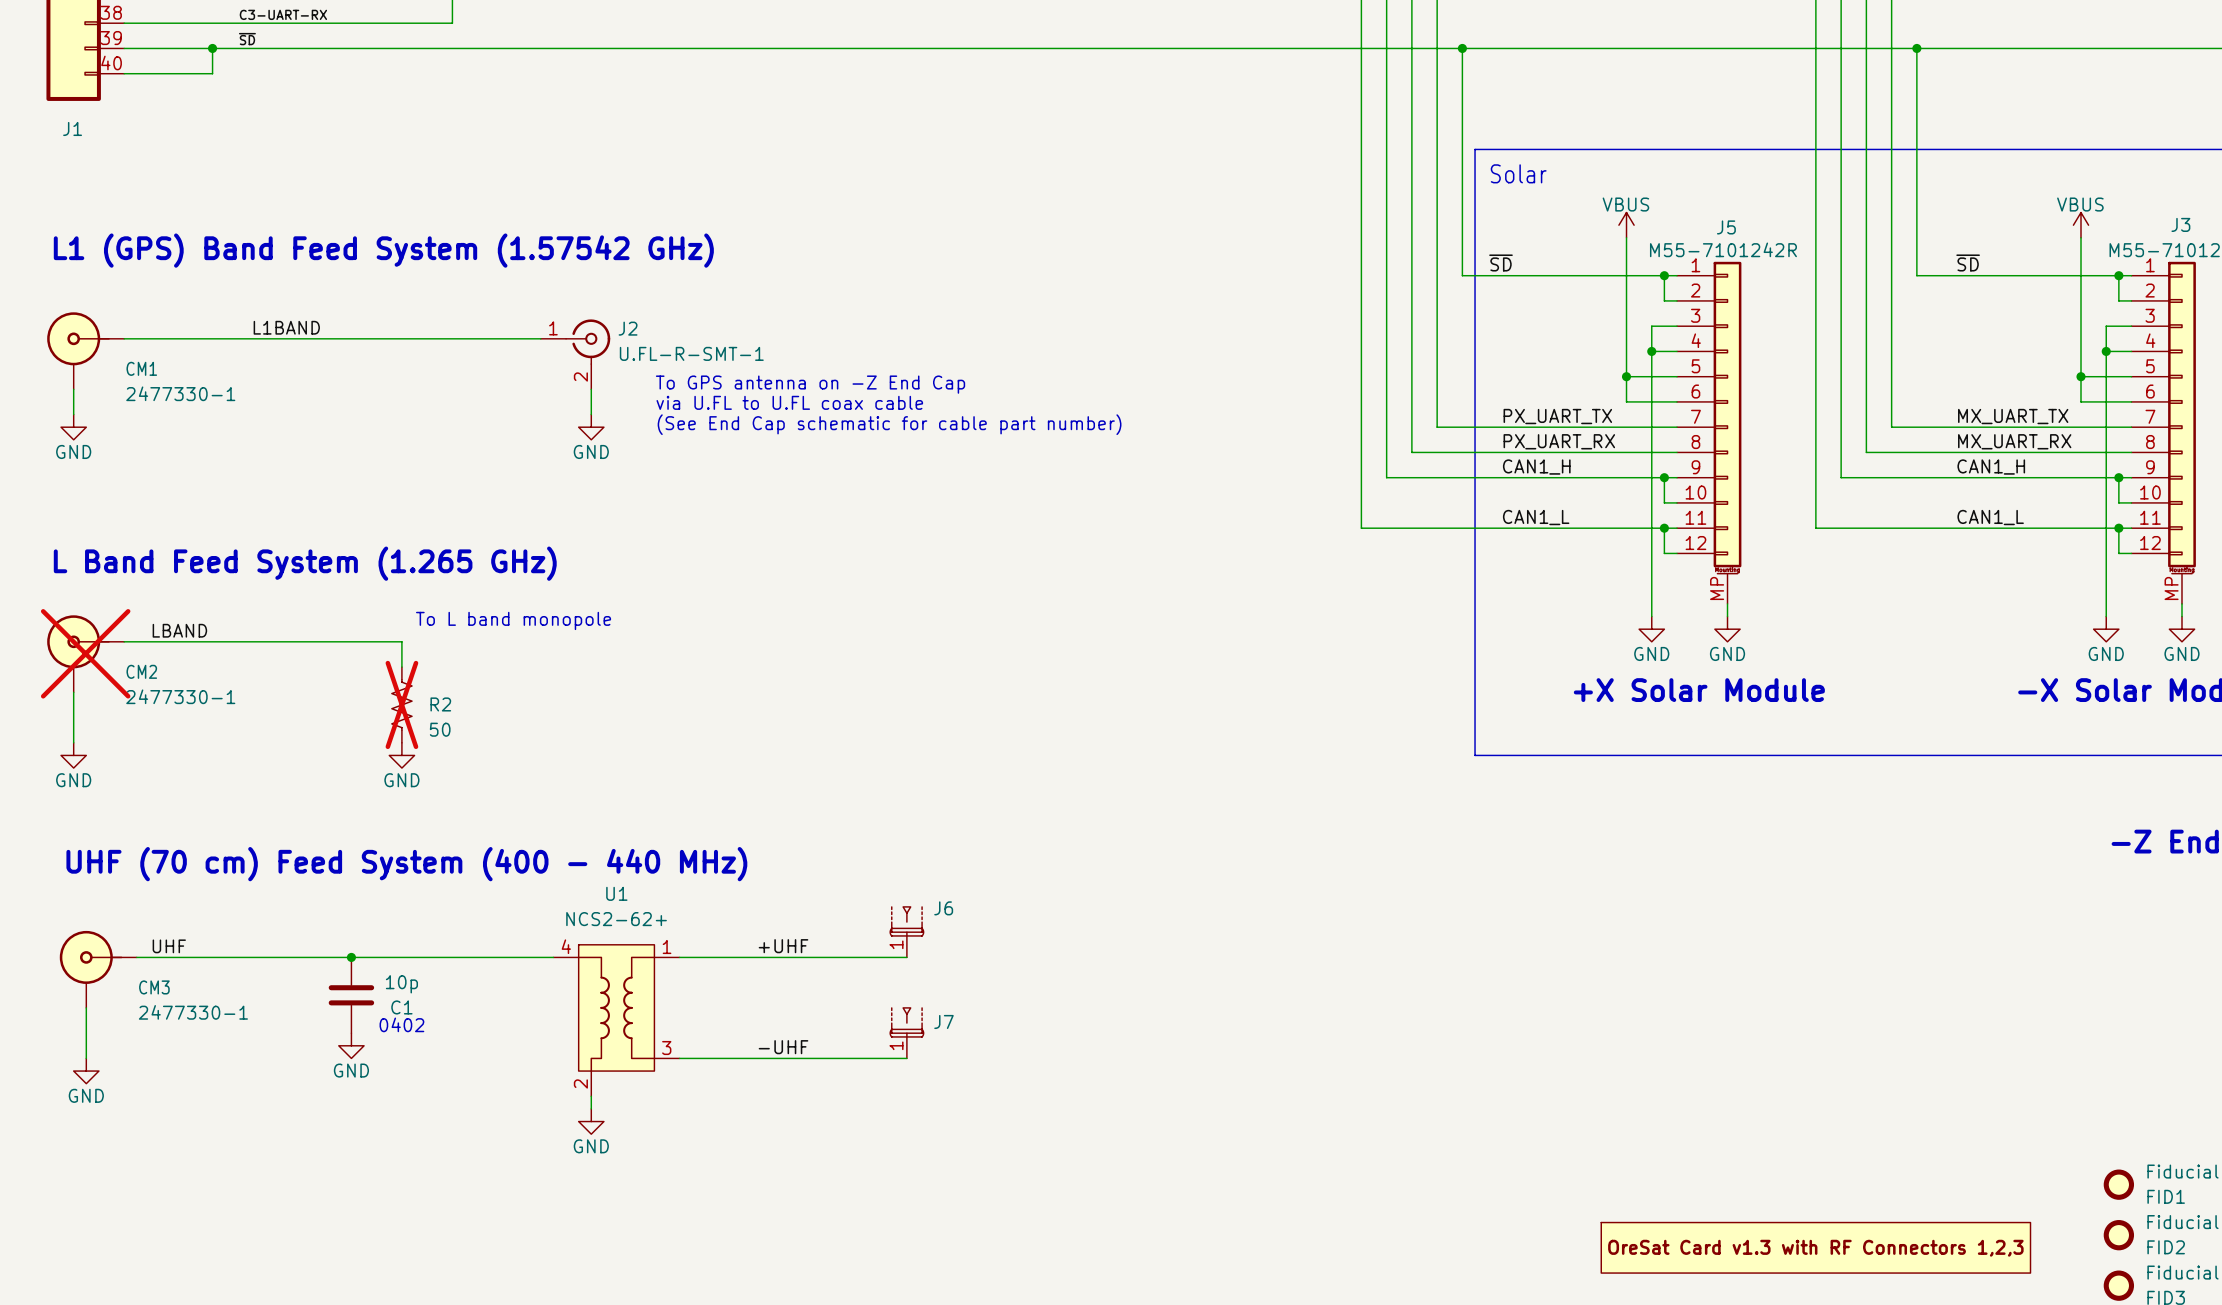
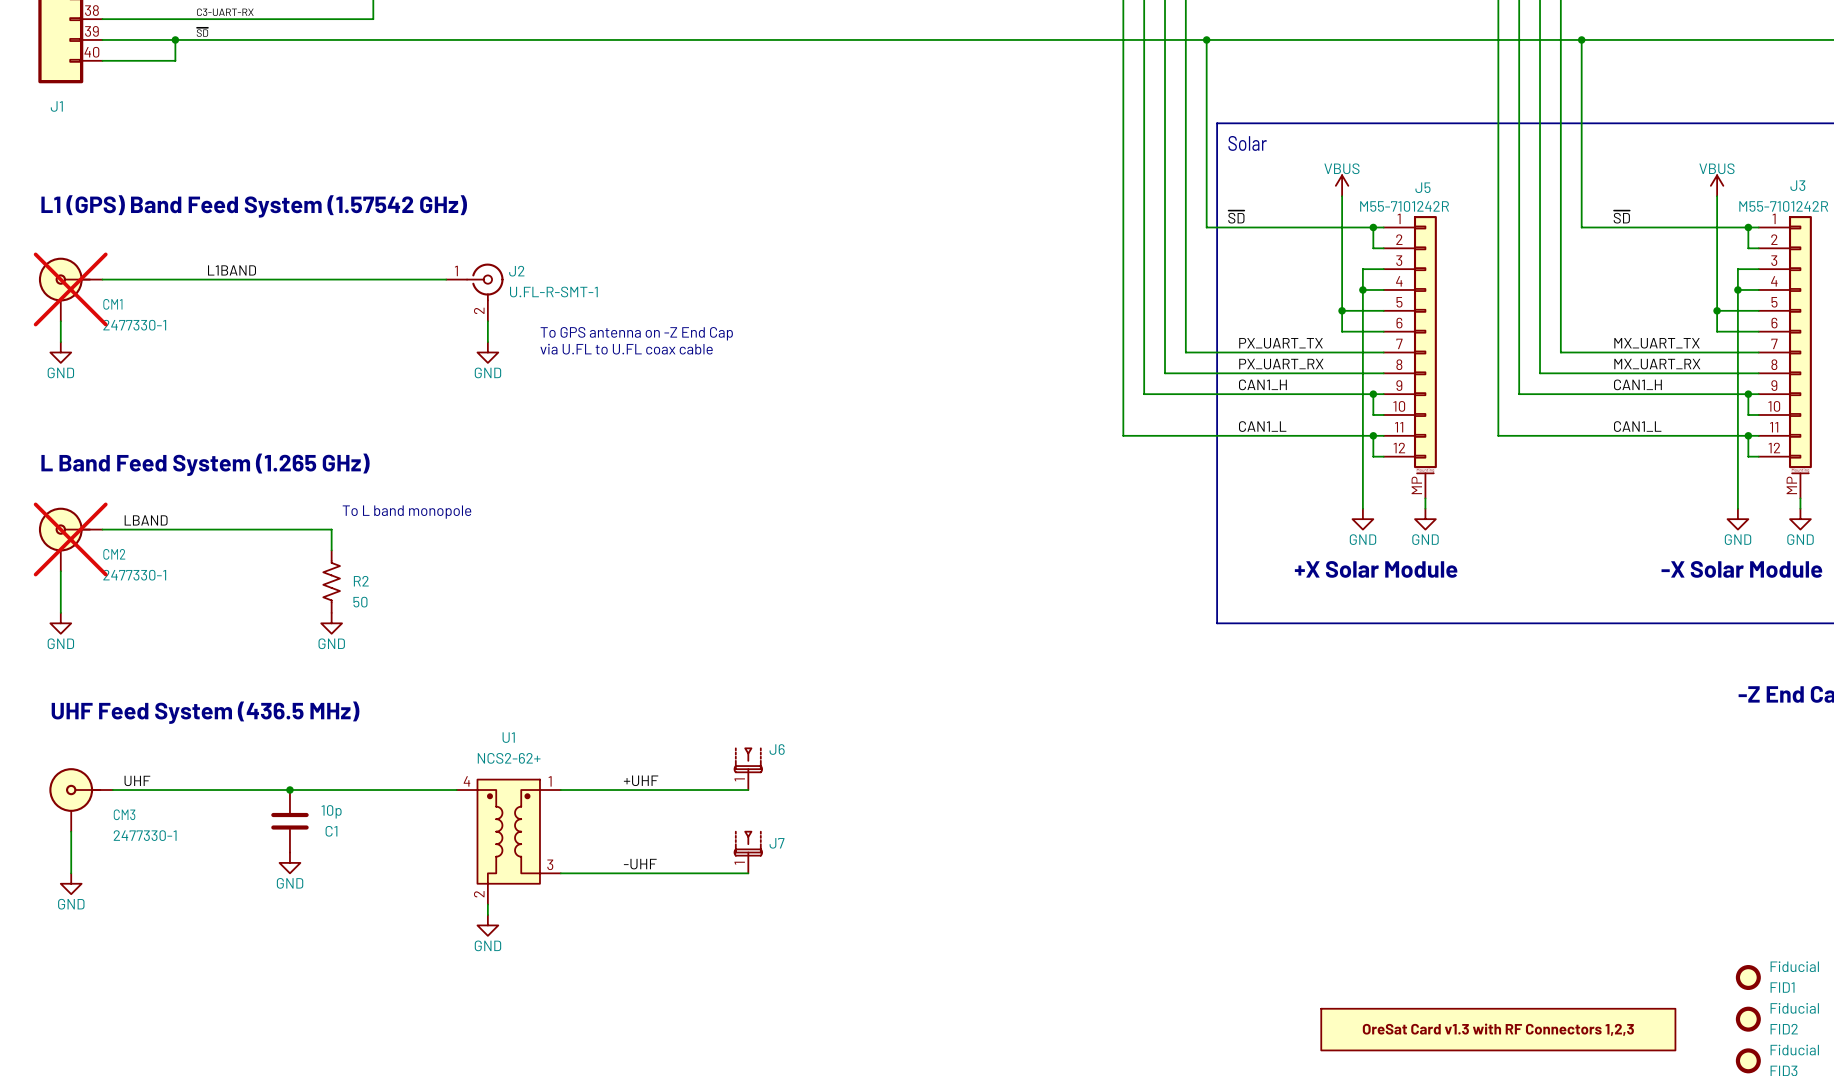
CM1 do-not-place cross: none -> (70, 289)
text: To GPS antenna on -Z End Cap (810, 384) -> none
text: via U.FL to U.FL coax cable (789, 402) -> To GPS antenna on -Z End Cap (636, 333)
text: (See End Cap schematic for cable part number) (889, 424) -> via U.FL to U.FL coax cable (626, 349)
R2 do-not-place cross: (401, 704) -> none
text: UHF (70 cm) Feed System (400 - 440 MHz) (406, 864) -> UHF Feed System (436.5 MHz) (205, 712)
U1 symbol: [553, 944, 680, 1097] -> [456, 779, 561, 905]
text: 0402 (401, 1024) -> none

